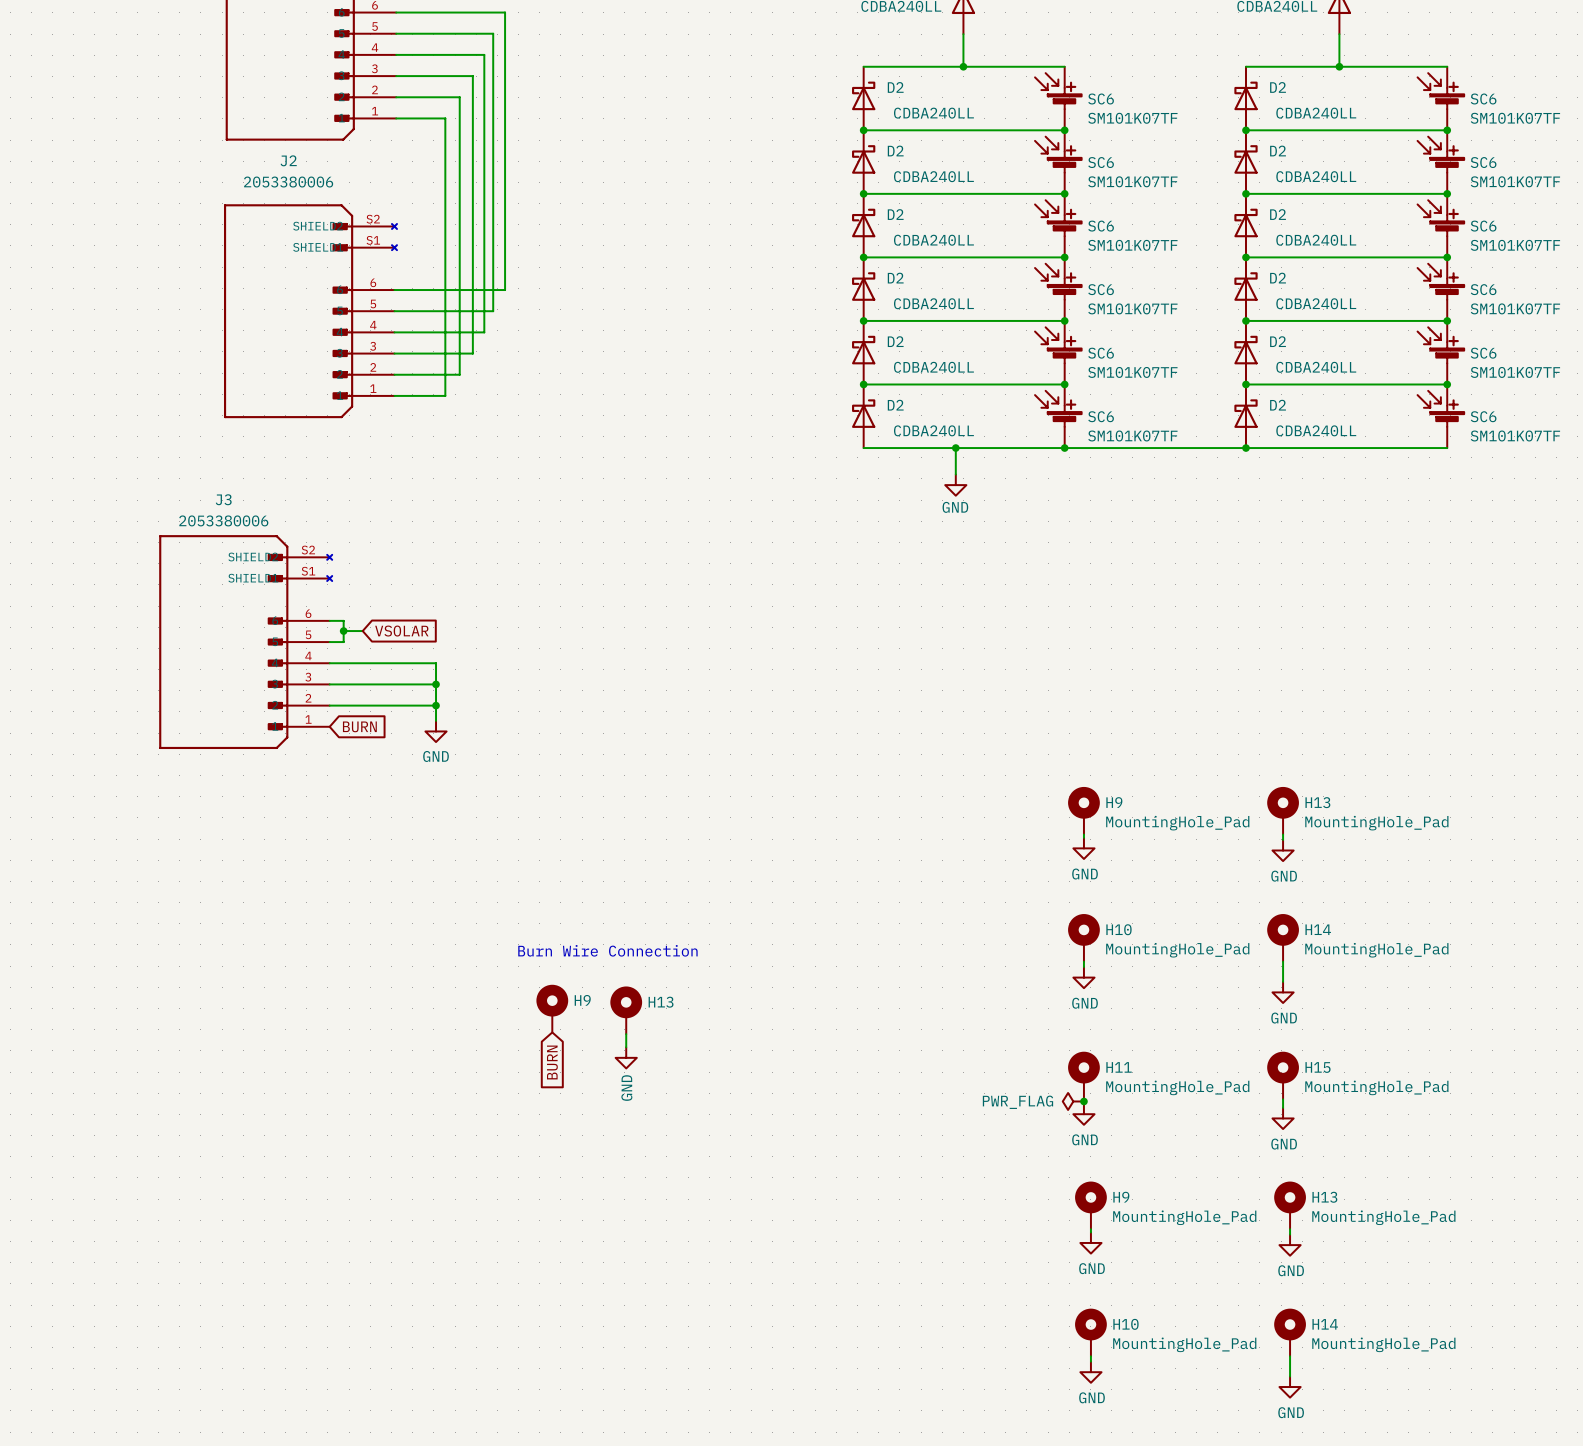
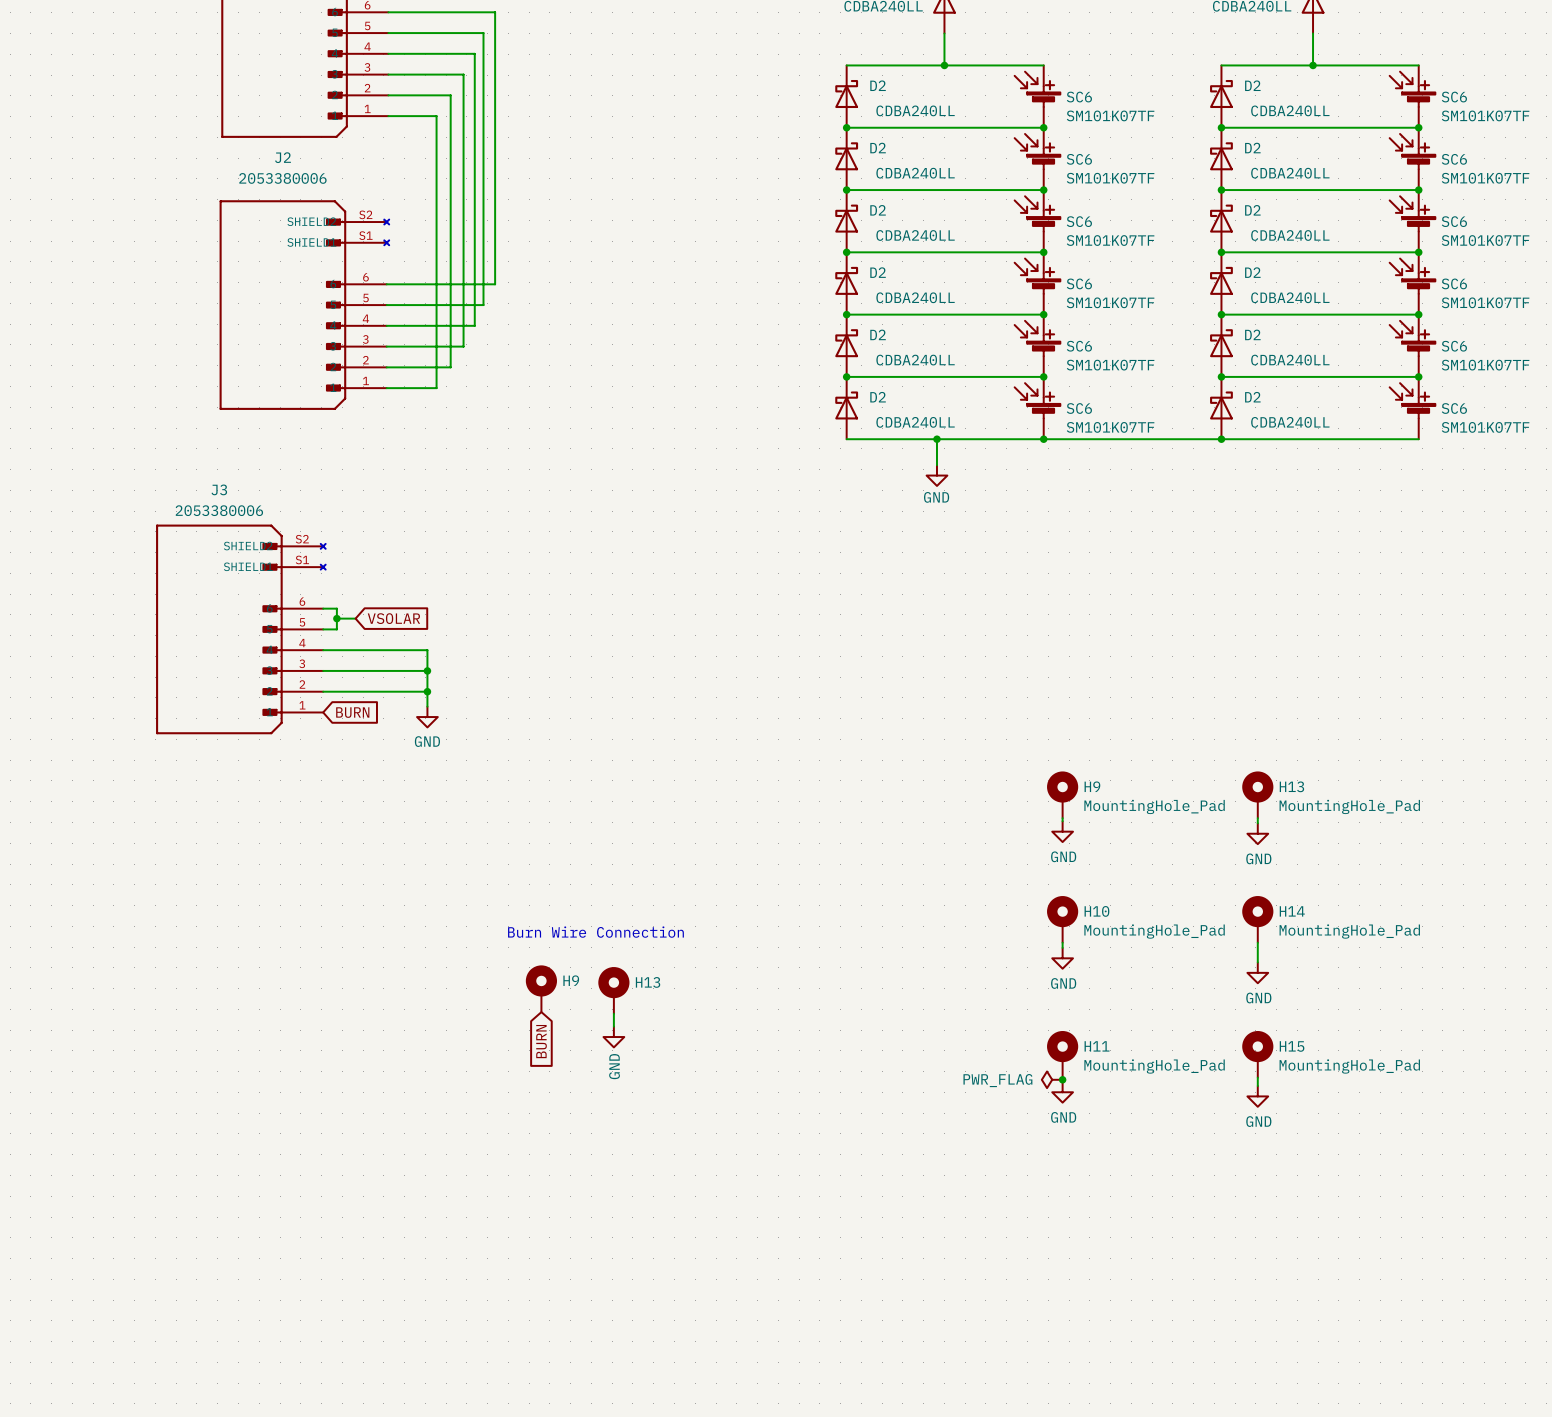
H9: MountingHole_Pad (1090, 1205) -> none
H13: MountingHole_Pad (1290, 1205) -> none
wire: (1090, 1229) (1090, 1232) -> none
wire: (1290, 1229) (1290, 1234) -> none
power symbol: GND (1090, 1242) -> none
power symbol: GND (1290, 1245) -> none
H10: MountingHole_Pad (1090, 1332) -> none
H14: MountingHole_Pad (1290, 1332) -> none
wire: (1090, 1356) (1090, 1361) -> none
wire: (1290, 1356) (1290, 1376) -> none
power symbol: GND (1090, 1372) -> none
power symbol: GND (1290, 1387) -> none

